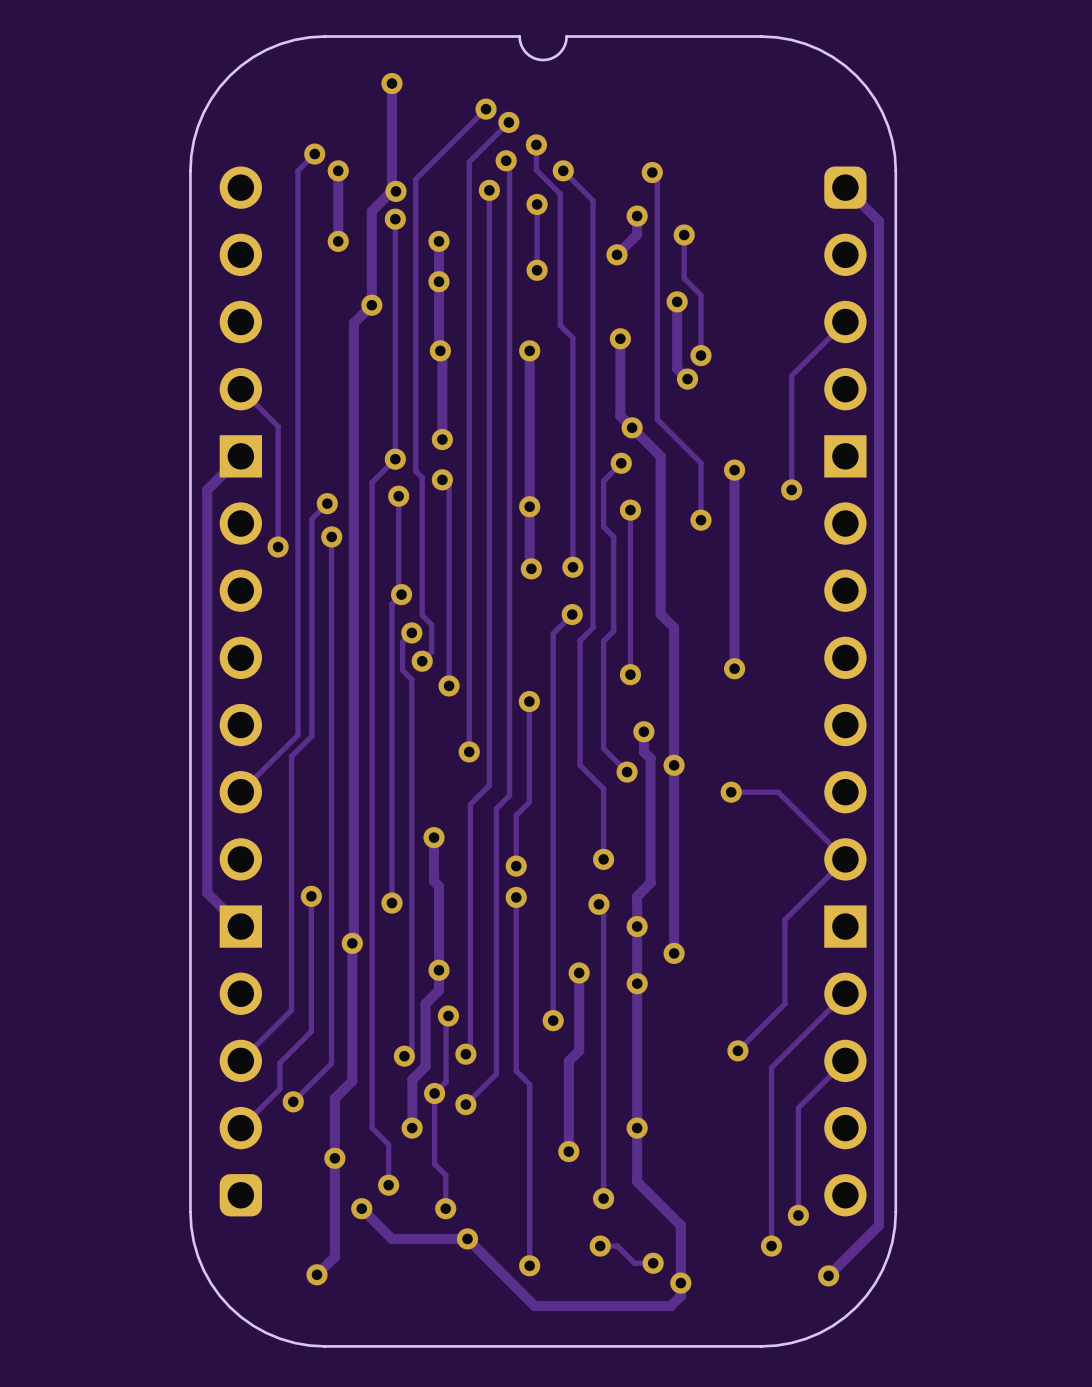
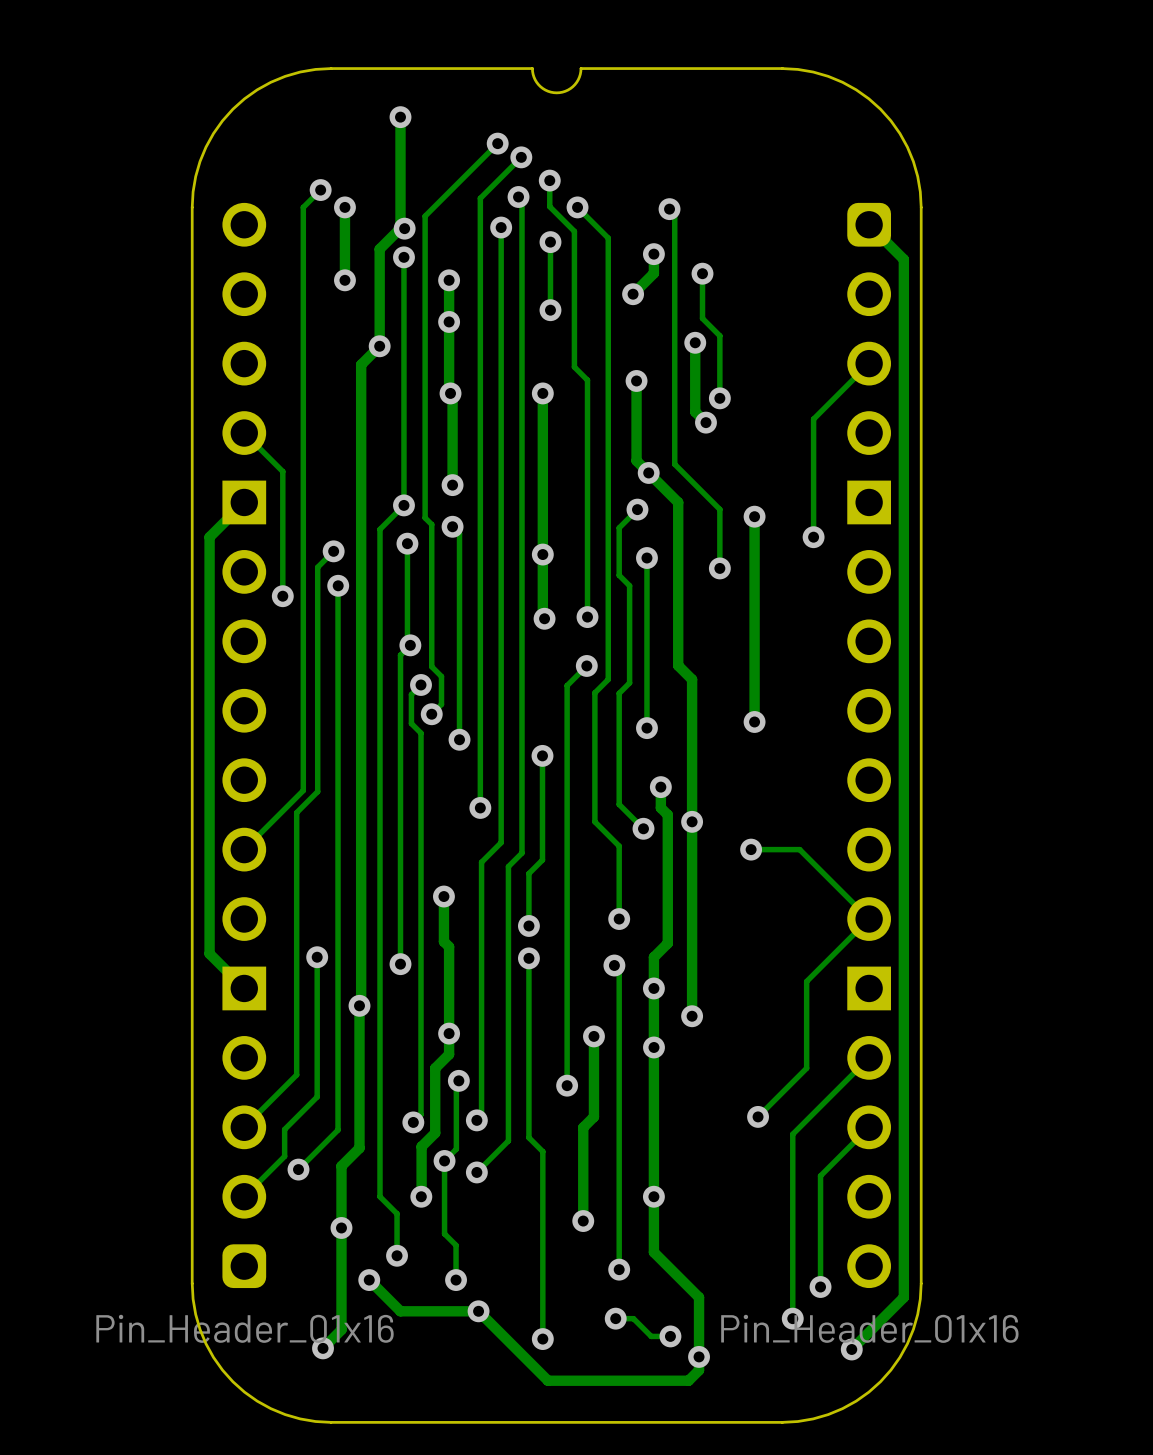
drawing: none -> [96, 1314, 394, 1343]
drawing: none -> [721, 1314, 1019, 1343]

